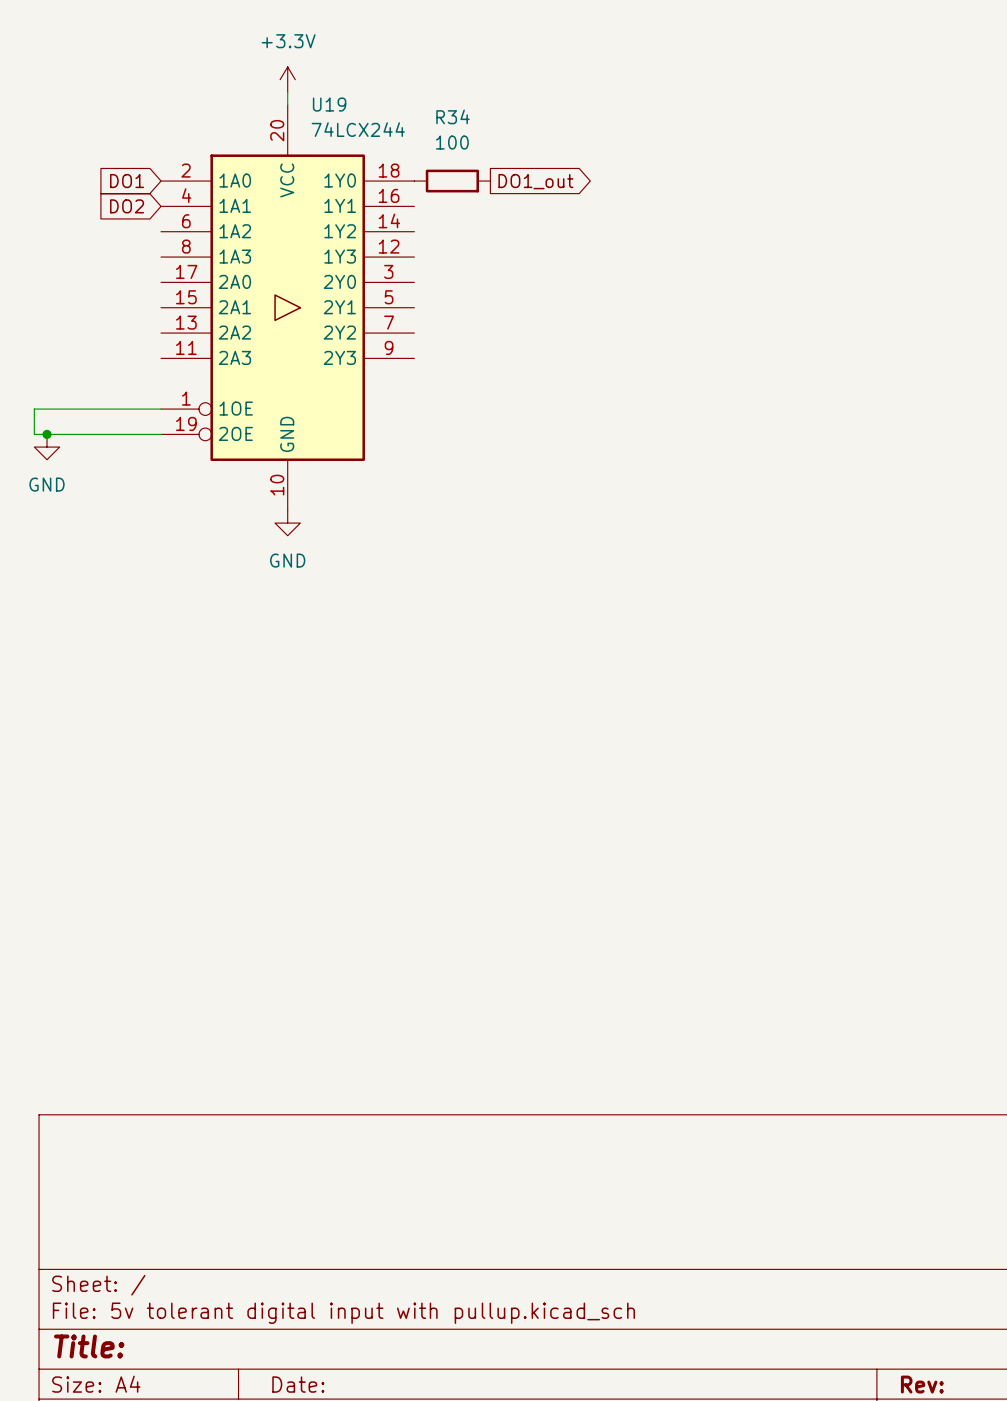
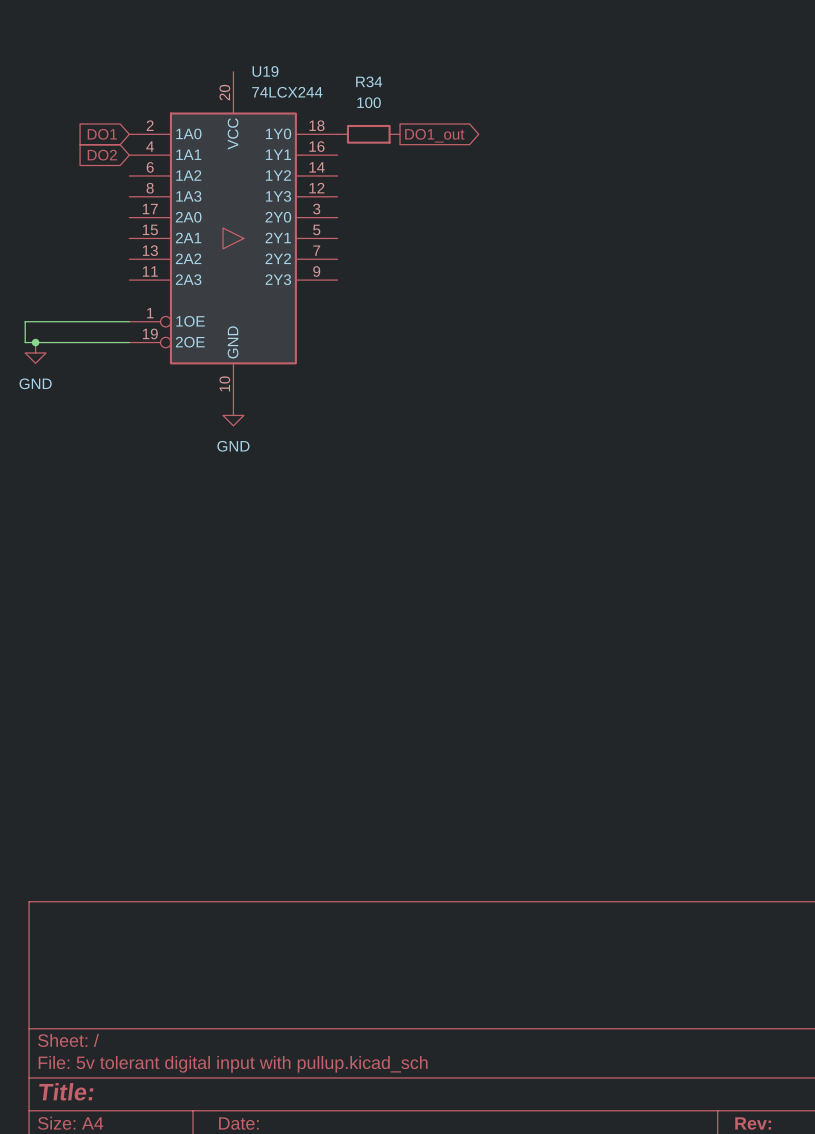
power symbol: +3.3V (287, 79) -> none
wire: (287, 92) (287, 105) -> none

